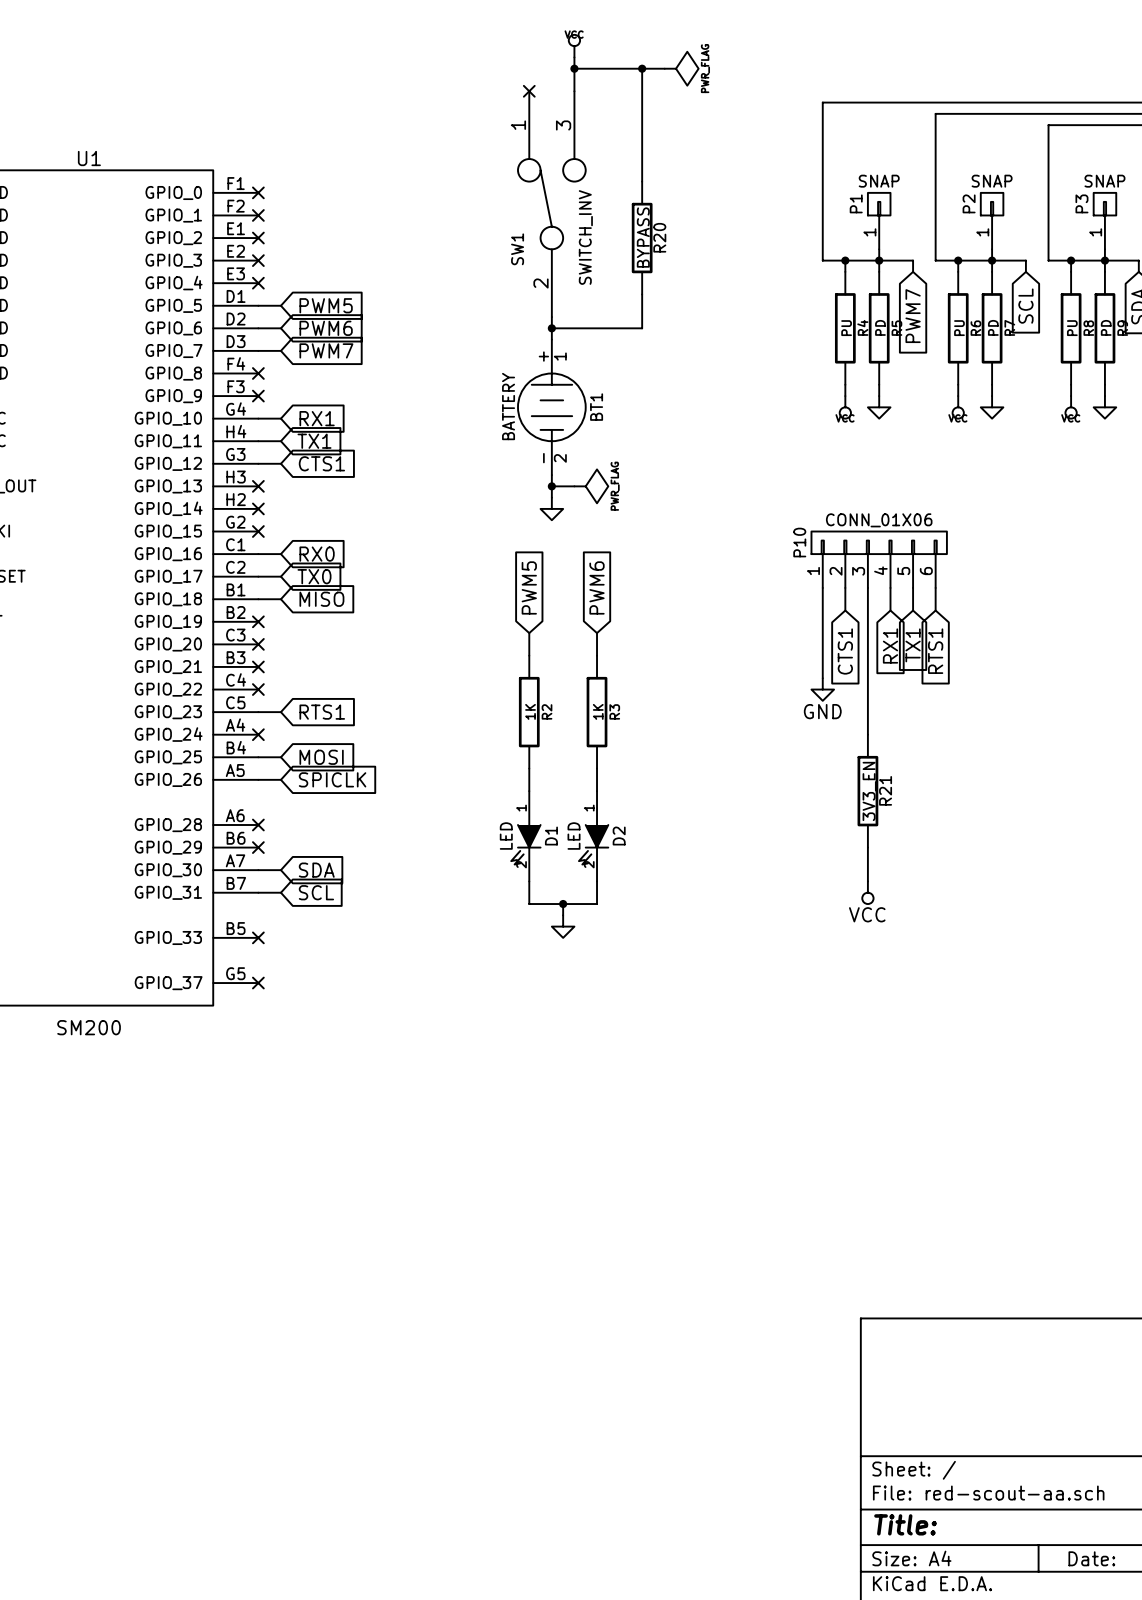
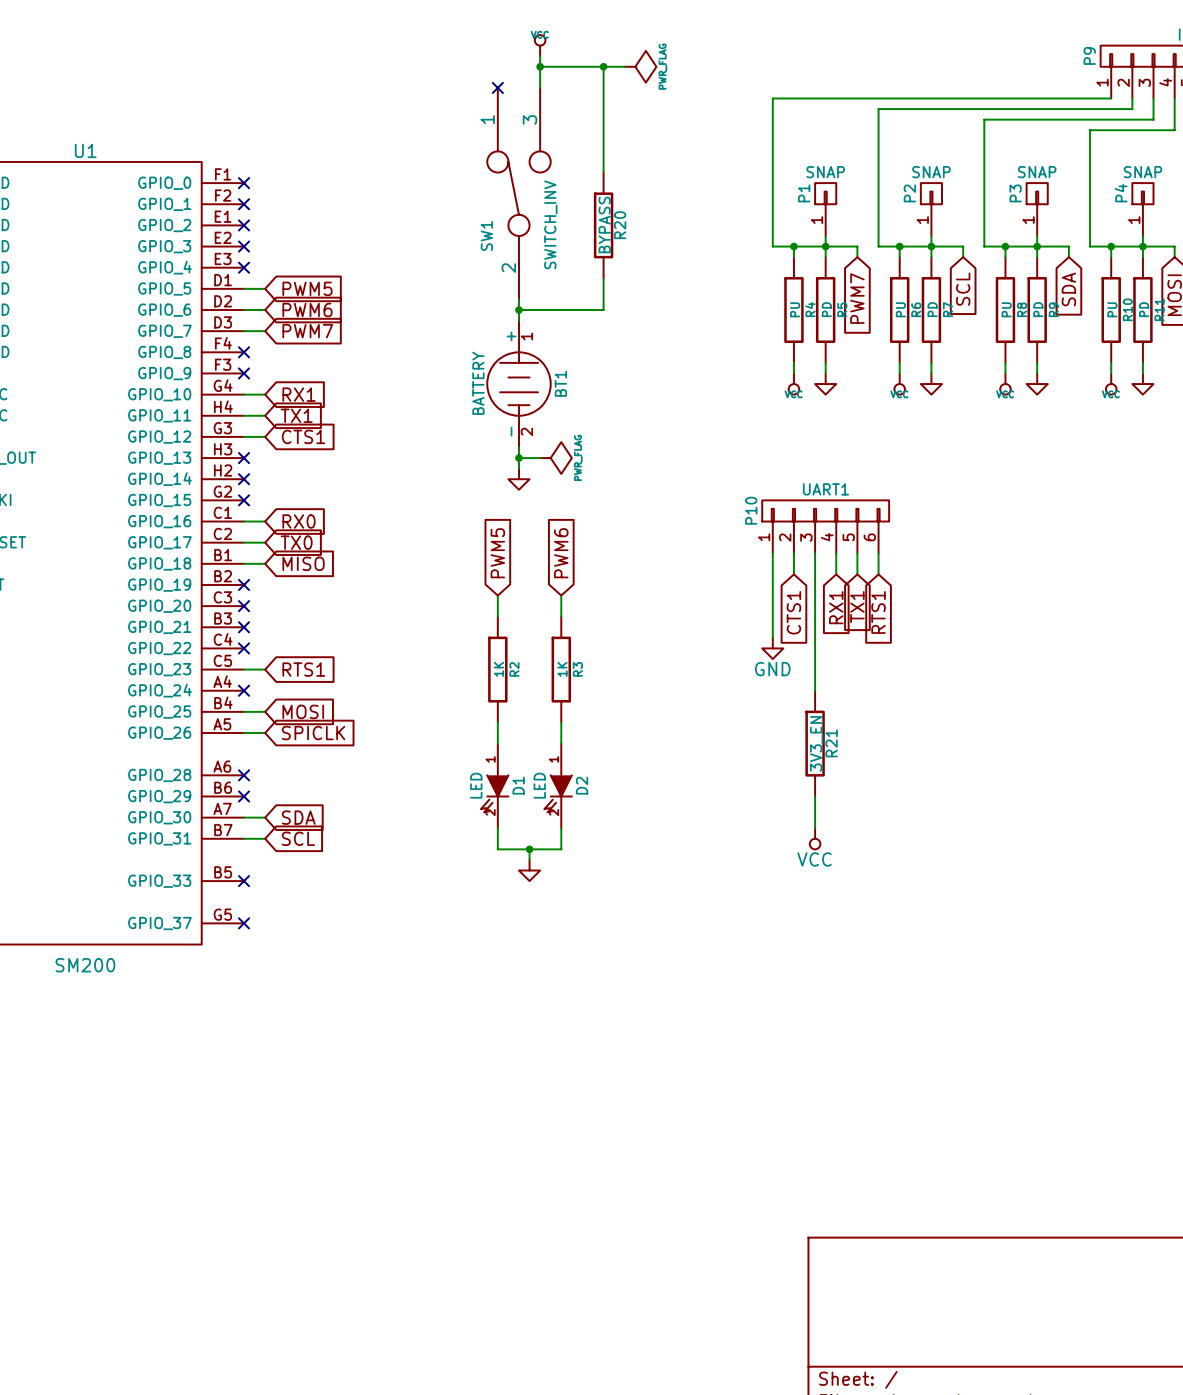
P10 value: CONN_01X06 (879, 520) -> UART1 (825, 489)

